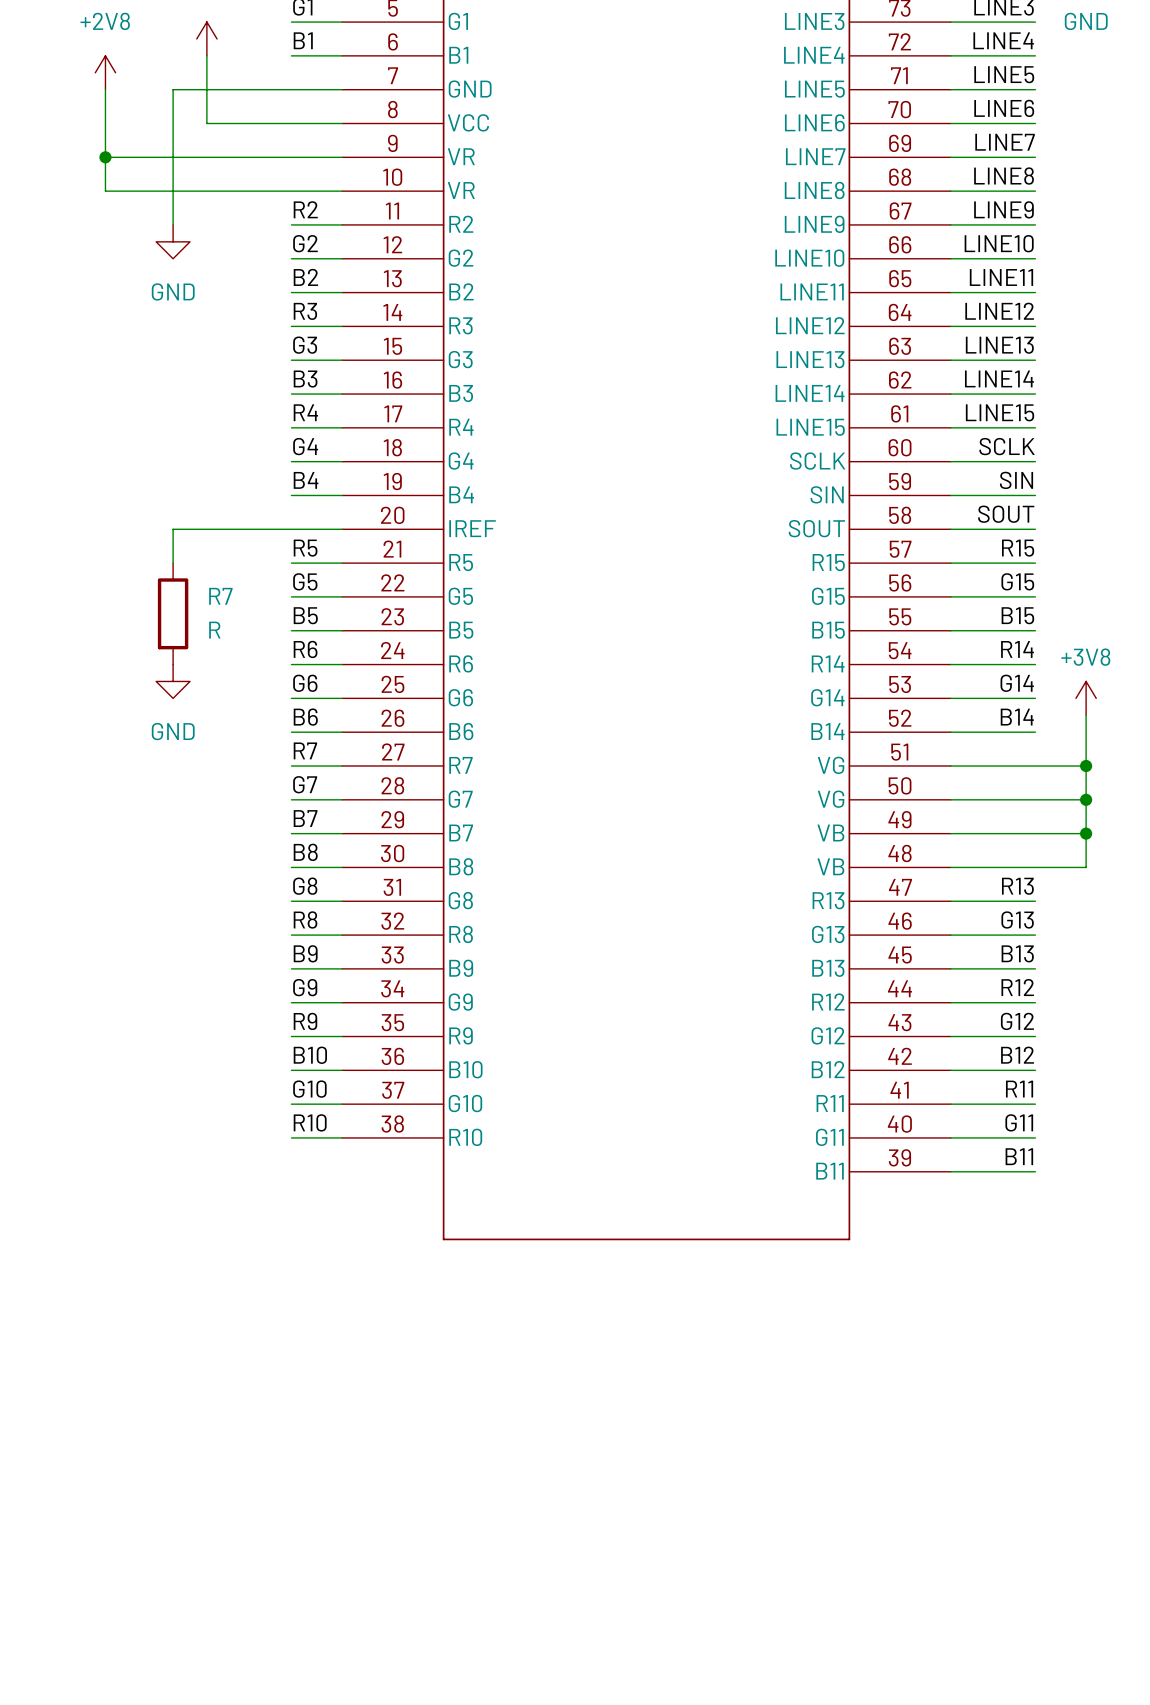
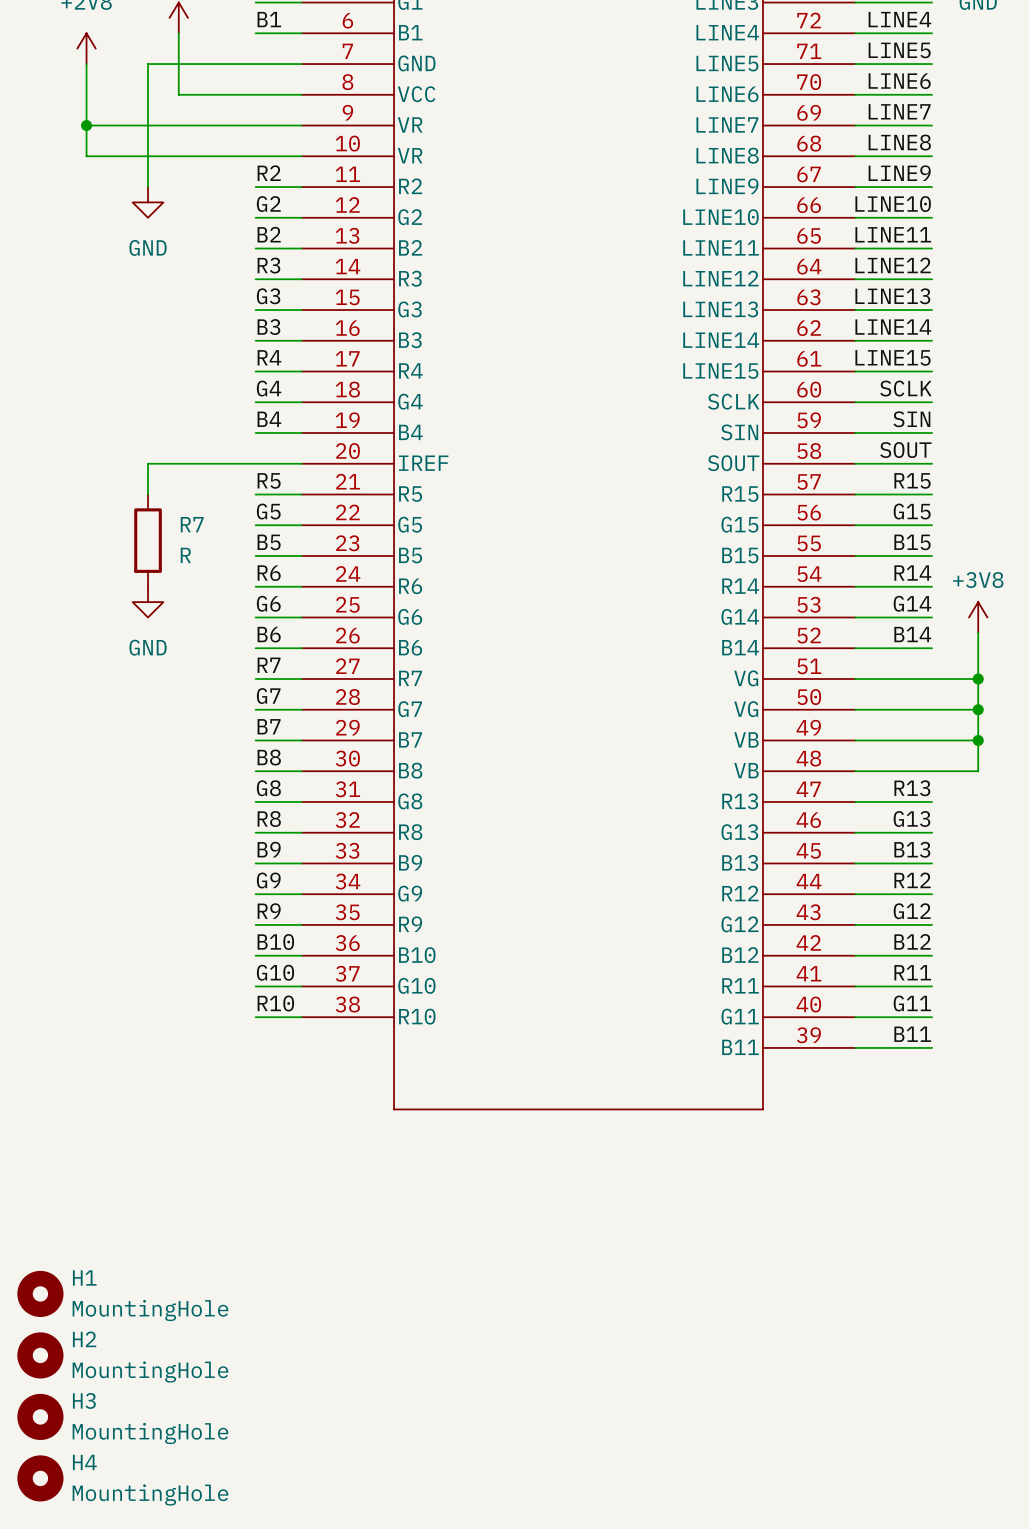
H1: none -> MountingHole (40, 1293)
H2: none -> MountingHole (40, 1355)
H3: none -> MountingHole (40, 1416)
H4: none -> MountingHole (40, 1478)

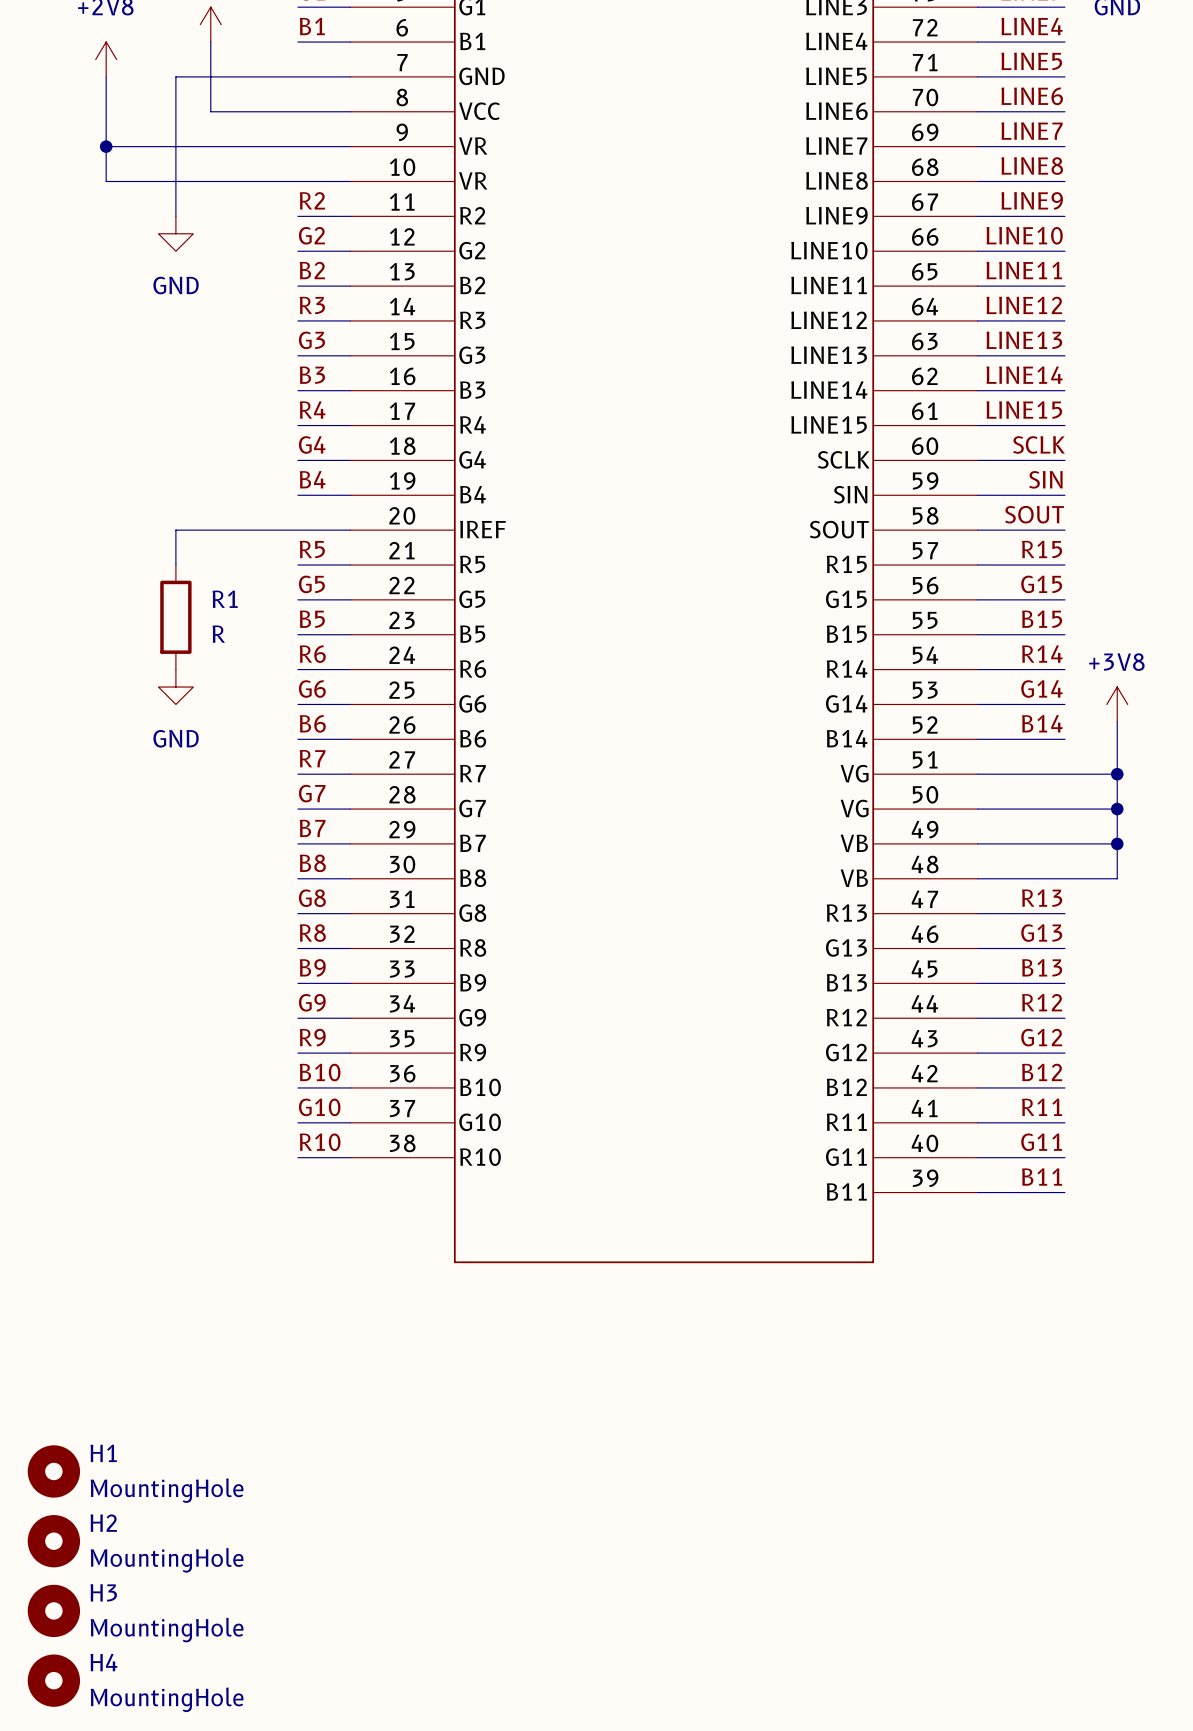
R7 name: R7 (192, 524) -> R1 (225, 599)

